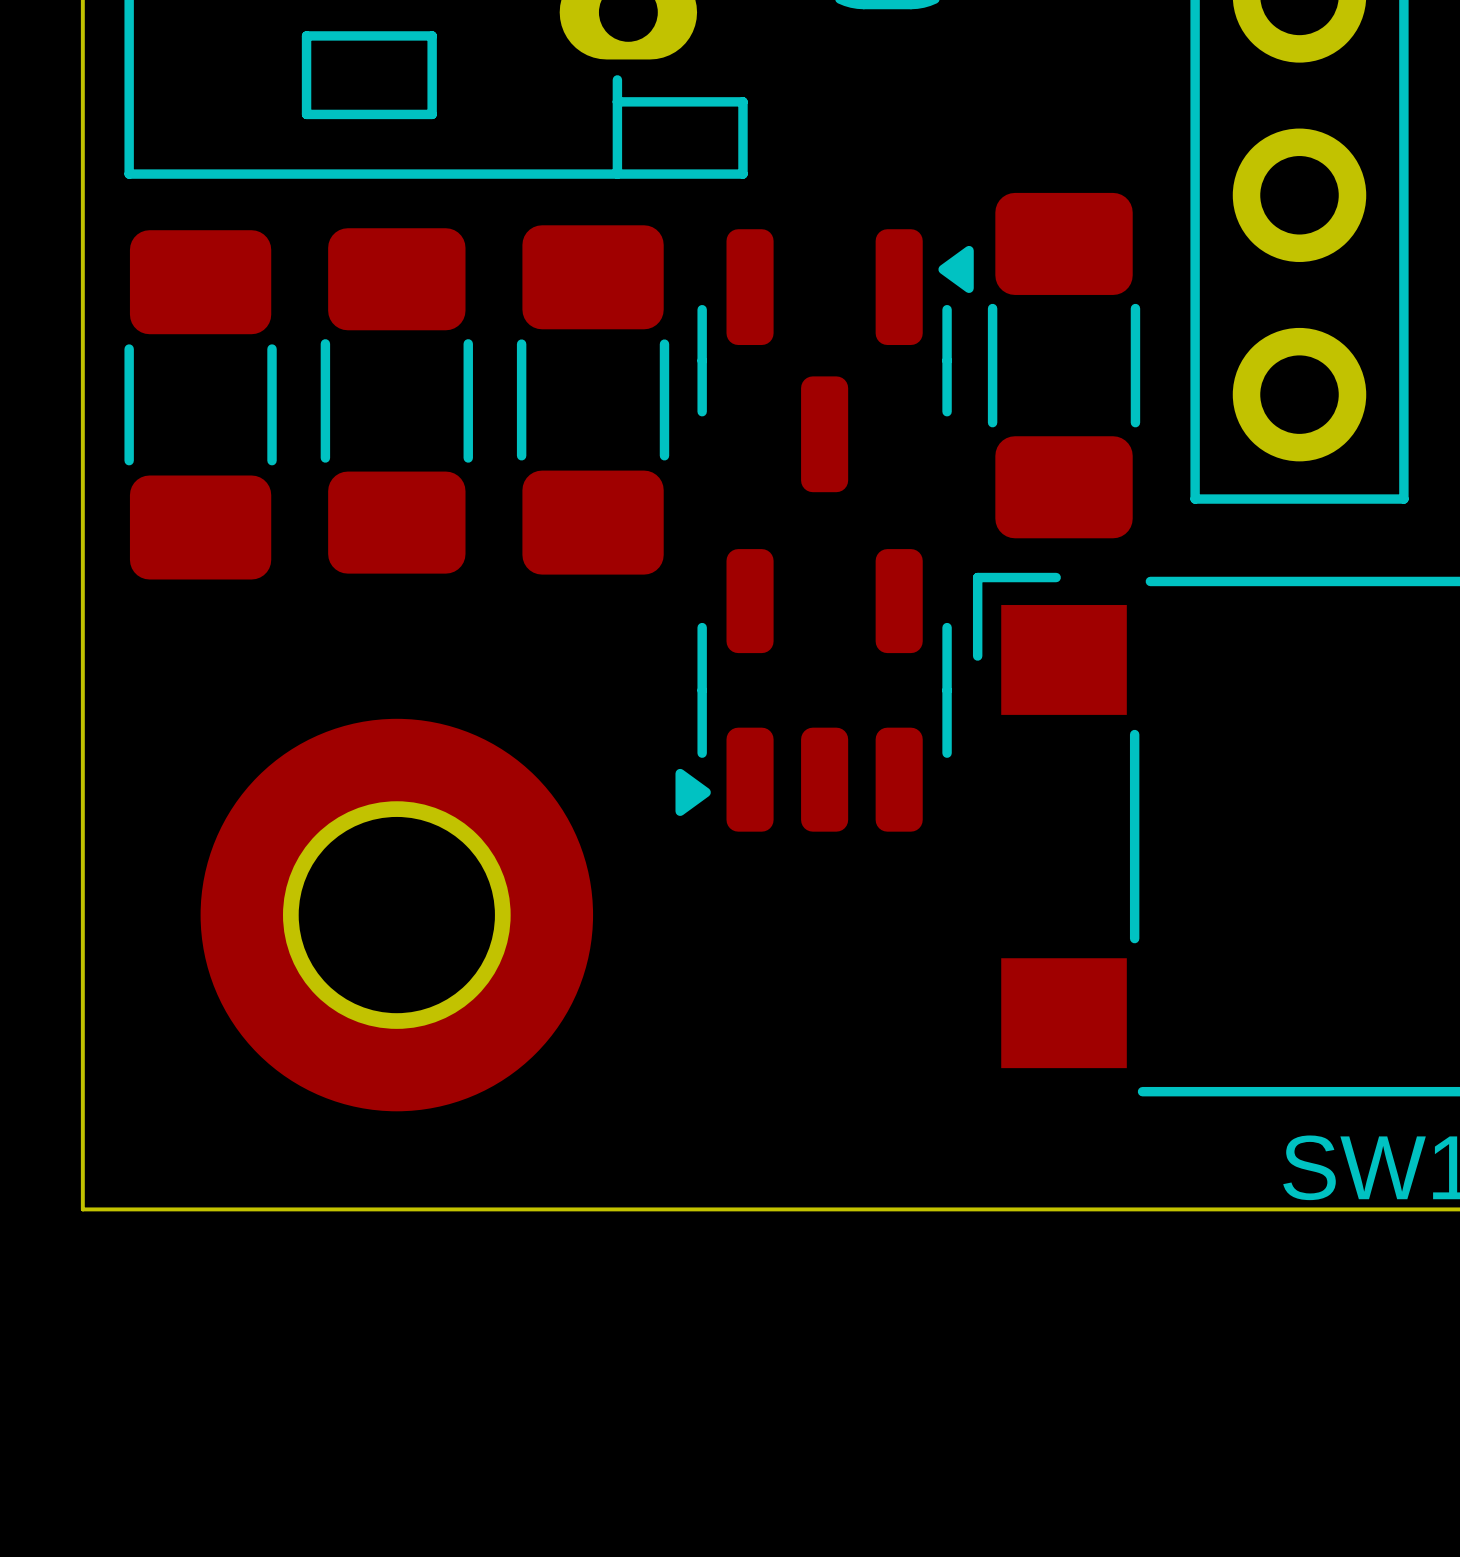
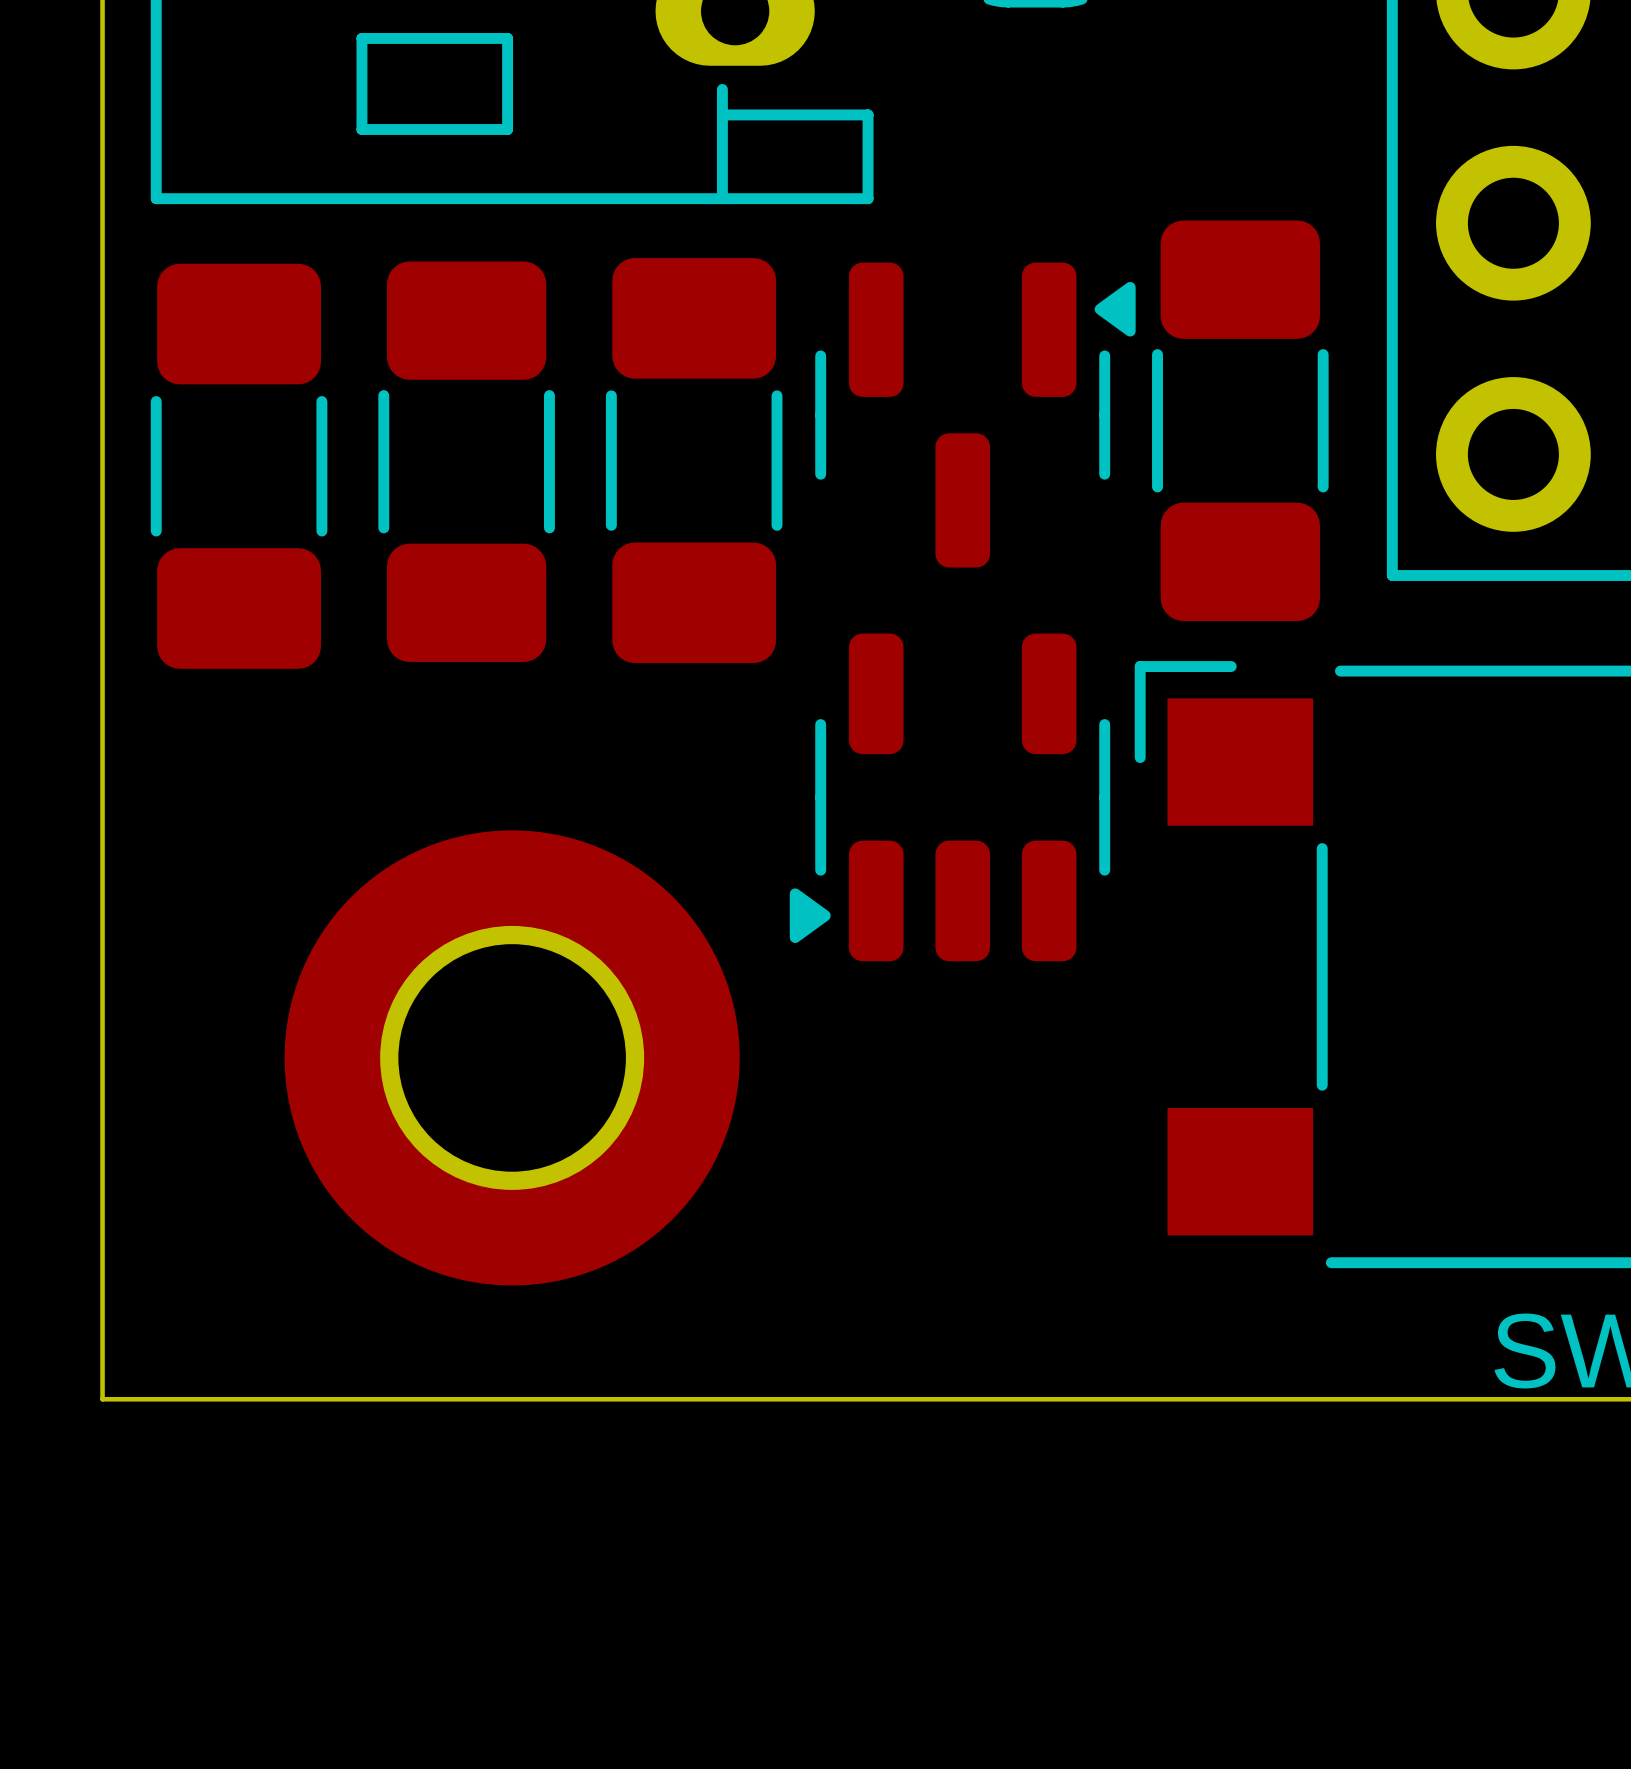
part position: (396, 915) -> (512, 1057)

